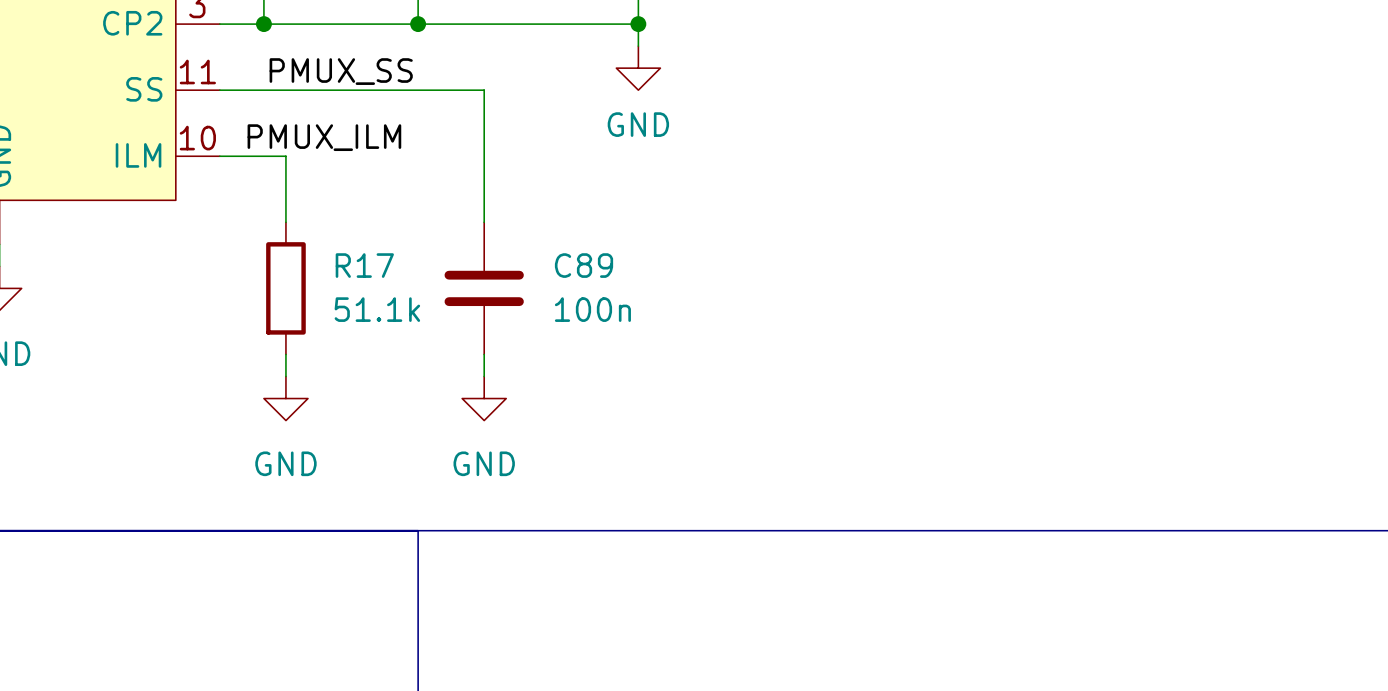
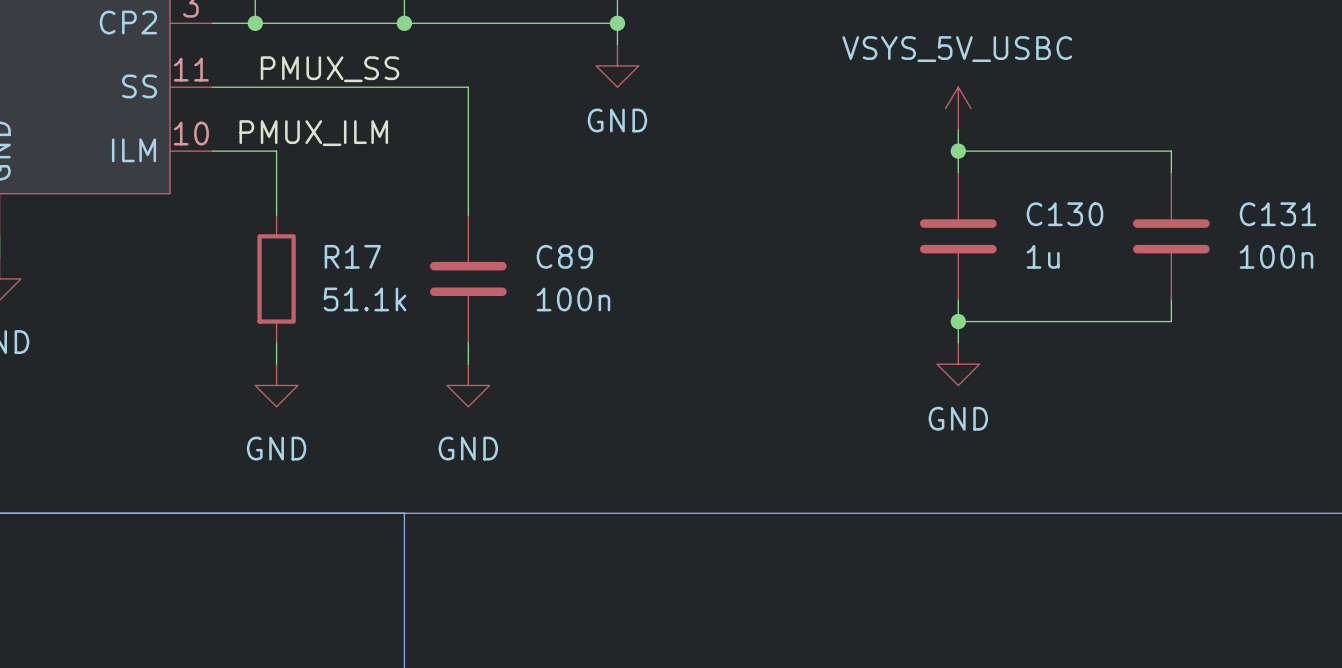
power symbol: none -> VSYS_5V_USBC (958, 108)
wire: none -> (958, 129) (958, 172)
wire: none -> (958, 151) (1171, 151) (1171, 172)
junction: none -> (958, 151)
C130: none -> 1u (958, 236)
C131: none -> 100n (1171, 236)
wire: none -> (958, 300) (958, 342)
wire: none -> (1171, 300) (1171, 321) (958, 321)
junction: none -> (958, 321)
power symbol: none -> GND (958, 364)

